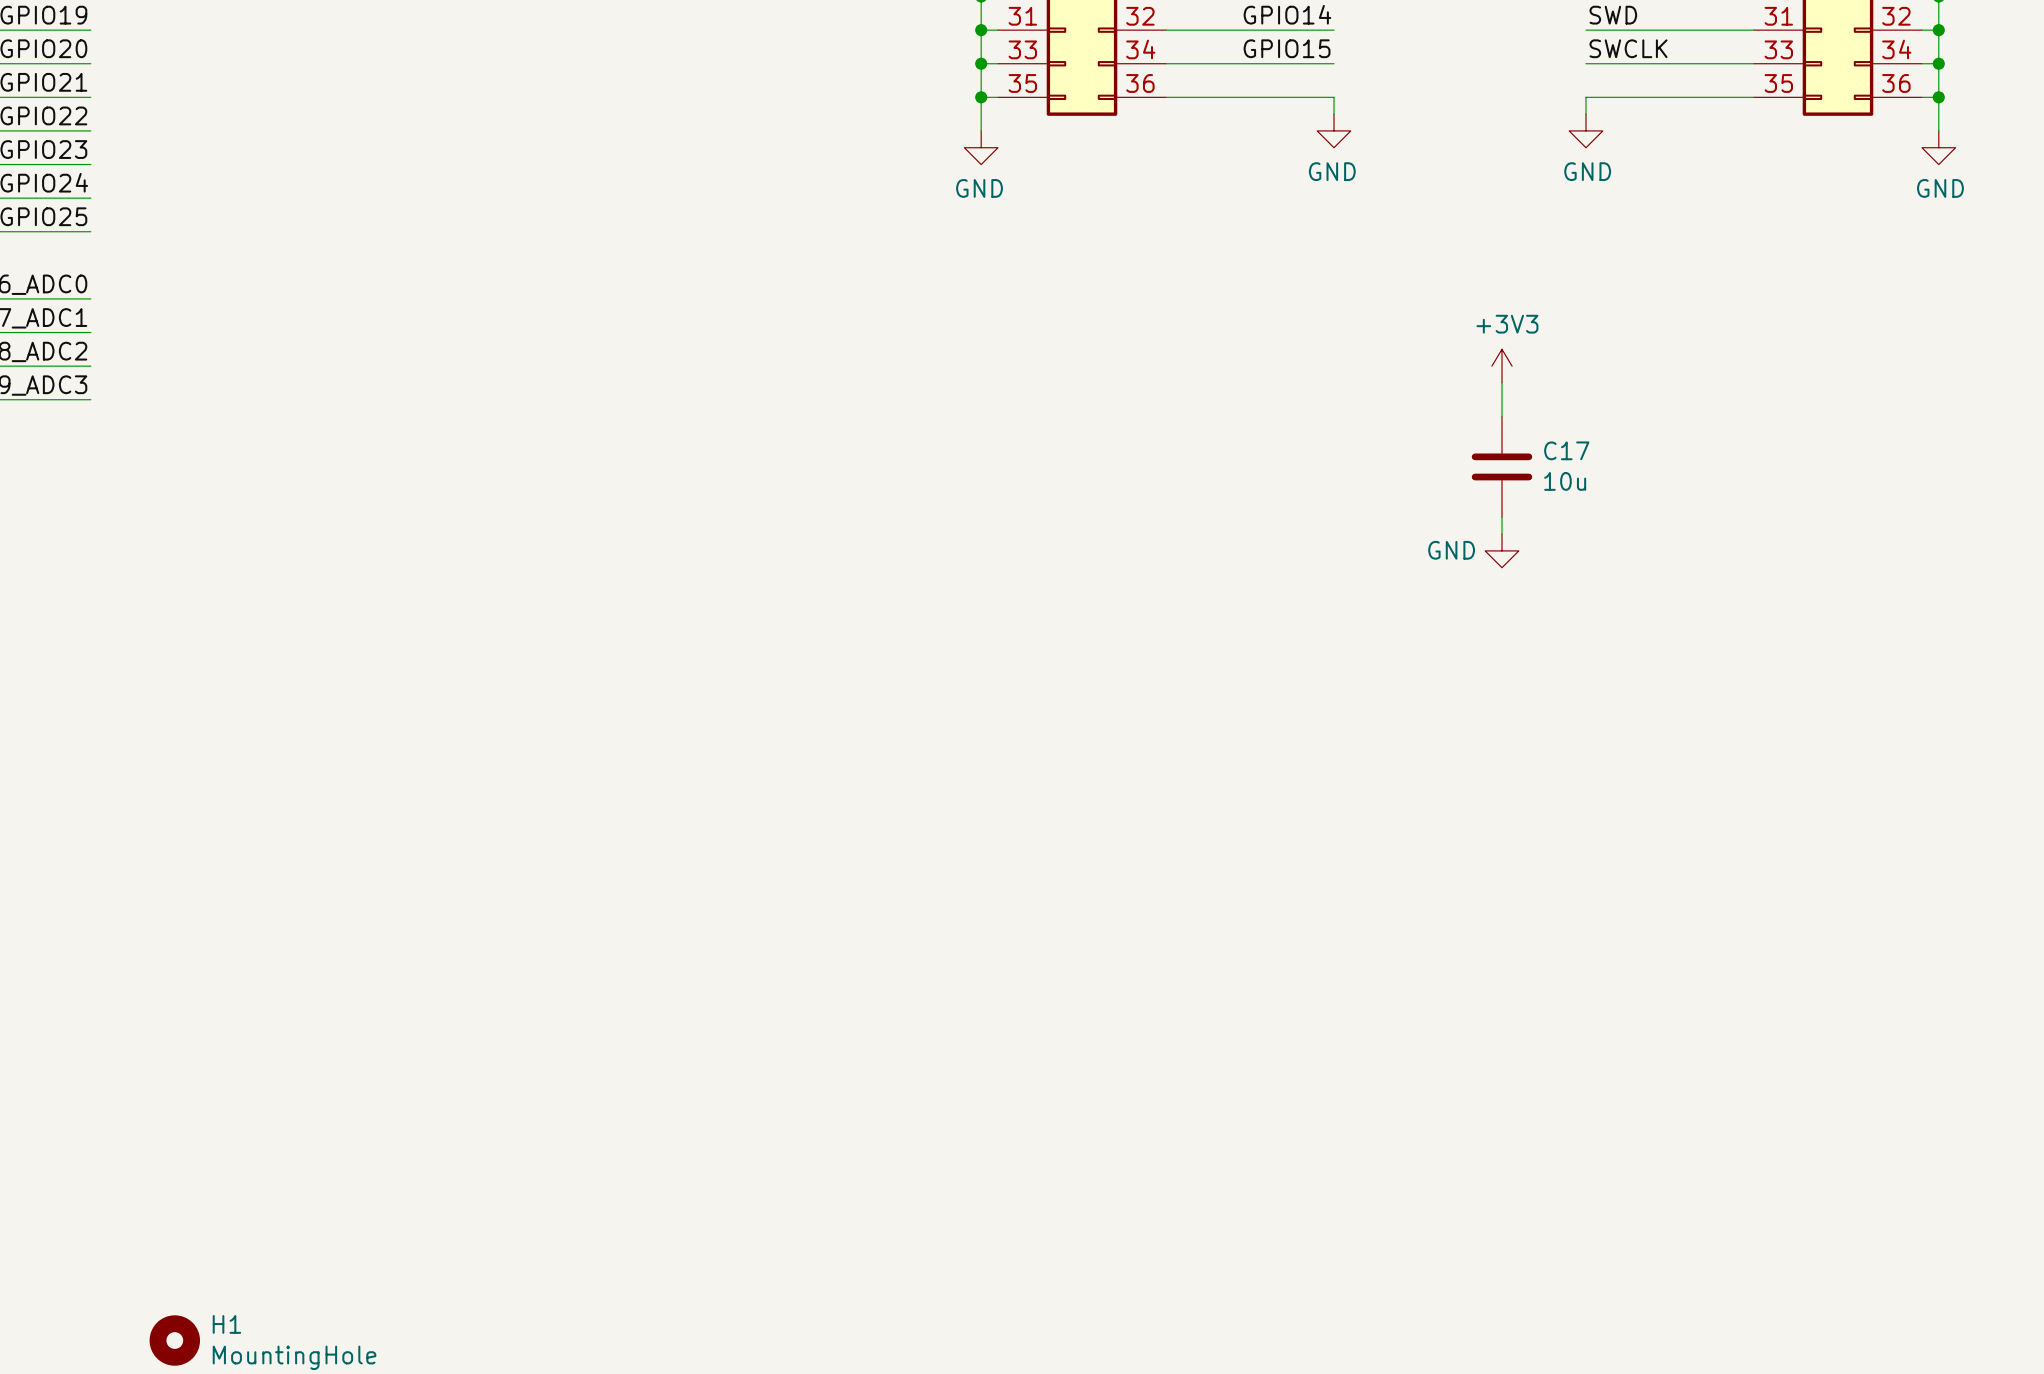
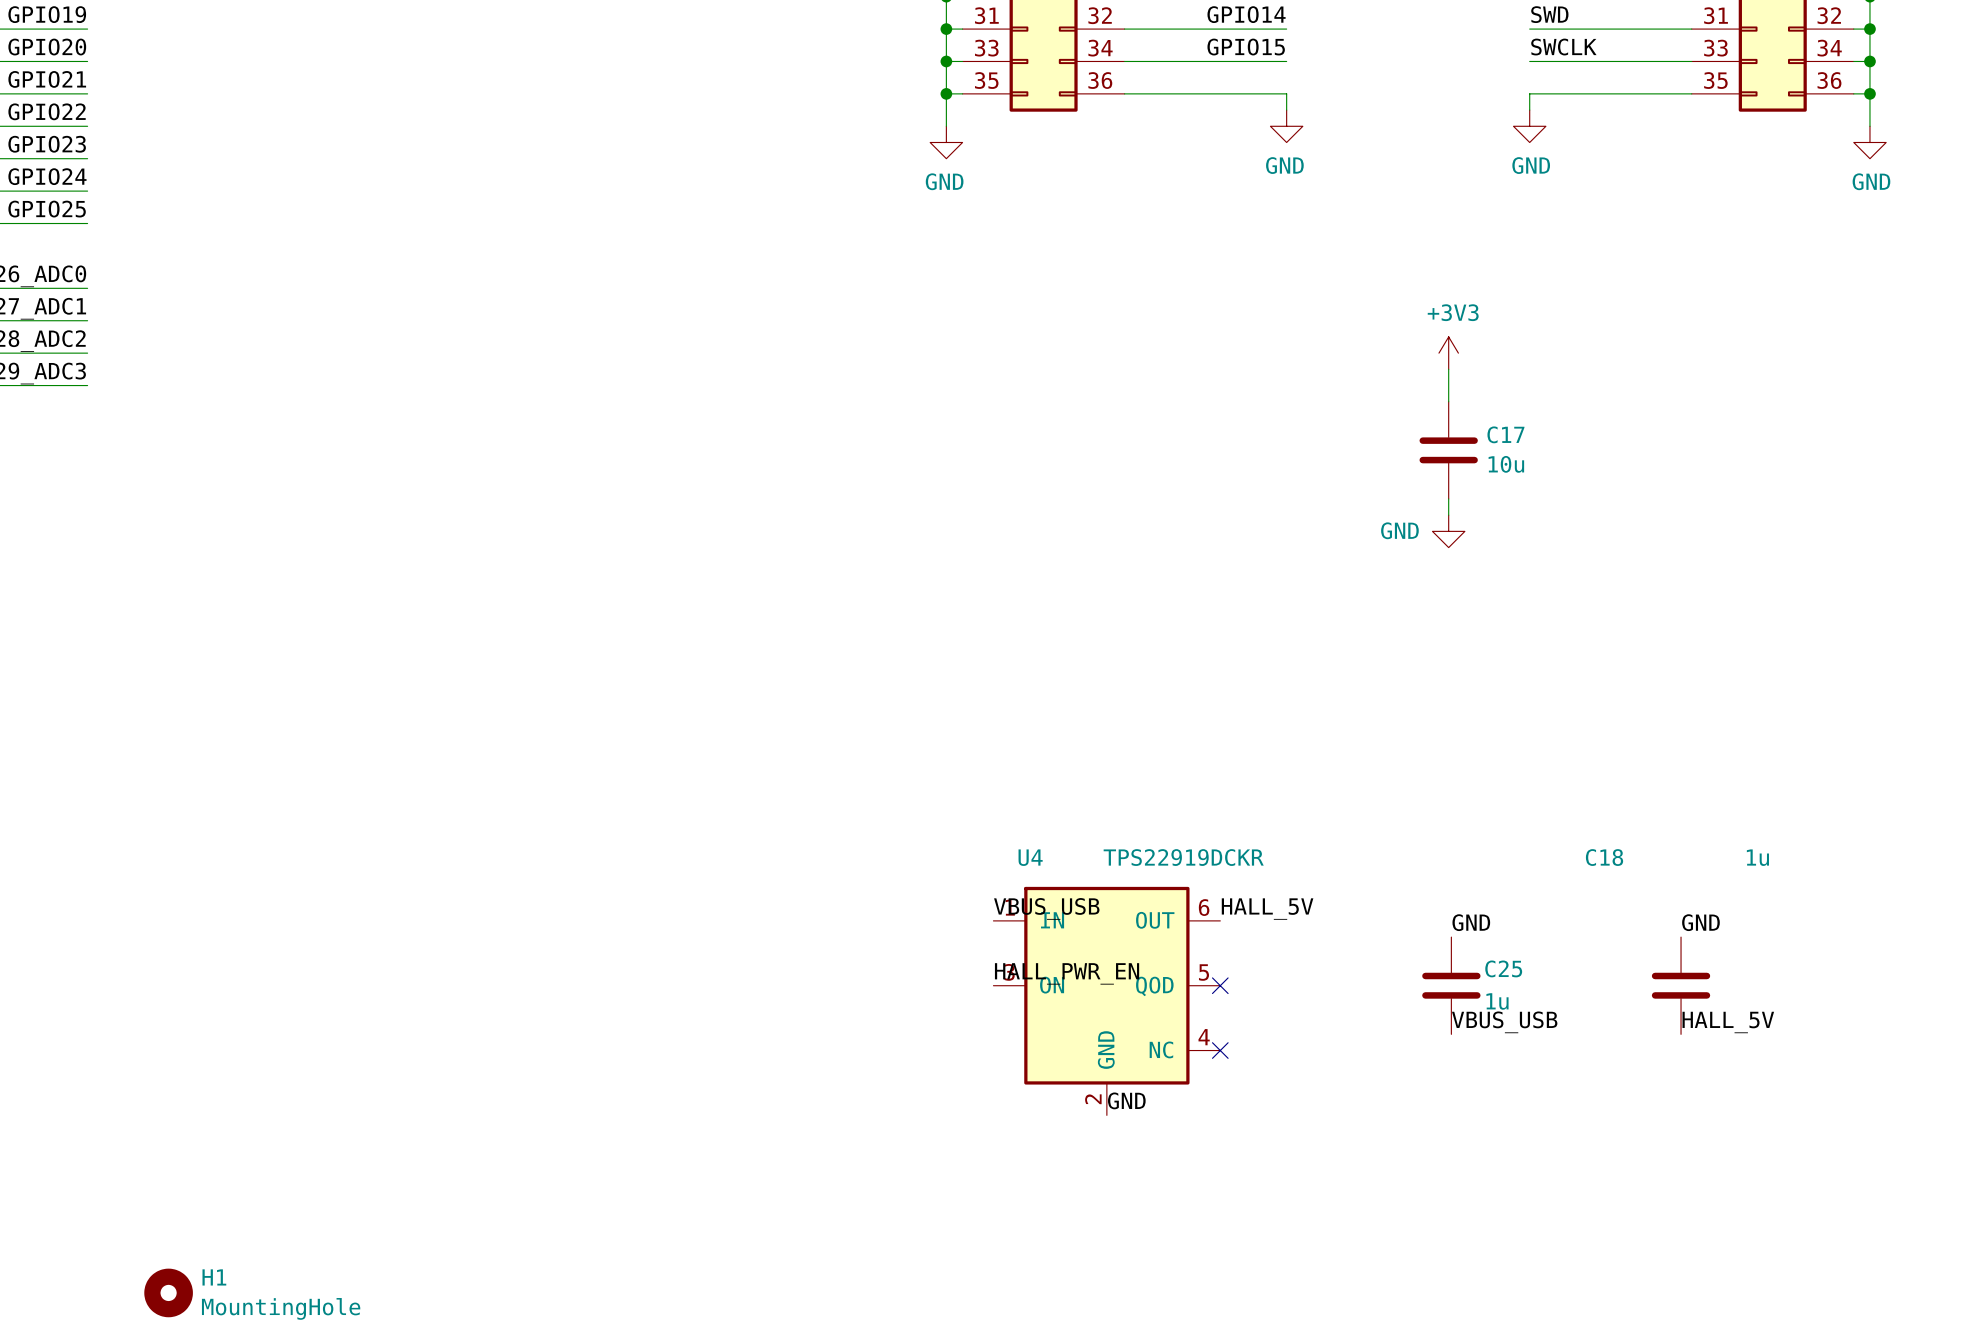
label: none -> VBUS_USB (1046, 908)
label: none -> HALL_5V (1267, 909)
label: none -> GND (1471, 922)
label: none -> GND (1700, 922)
label: none -> HALL_PWR_EN (1067, 973)
no-connect mark: none -> (1220, 985)
C25: none -> 1u (1451, 985)
C18: none -> 1u (1681, 985)
U4: none -> TPS22919DCKR (1106, 1001)
label: none -> VBUS_USB (1504, 1022)
label: none -> HALL_5V (1728, 1022)
no-connect mark: none -> (1220, 1050)
label: none -> GND (1126, 1100)

